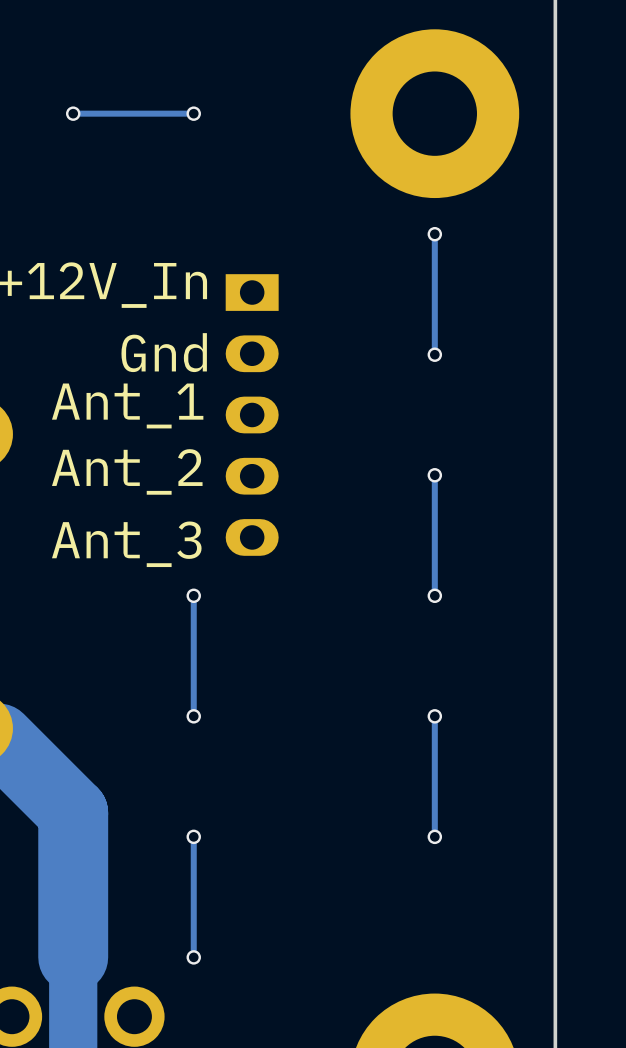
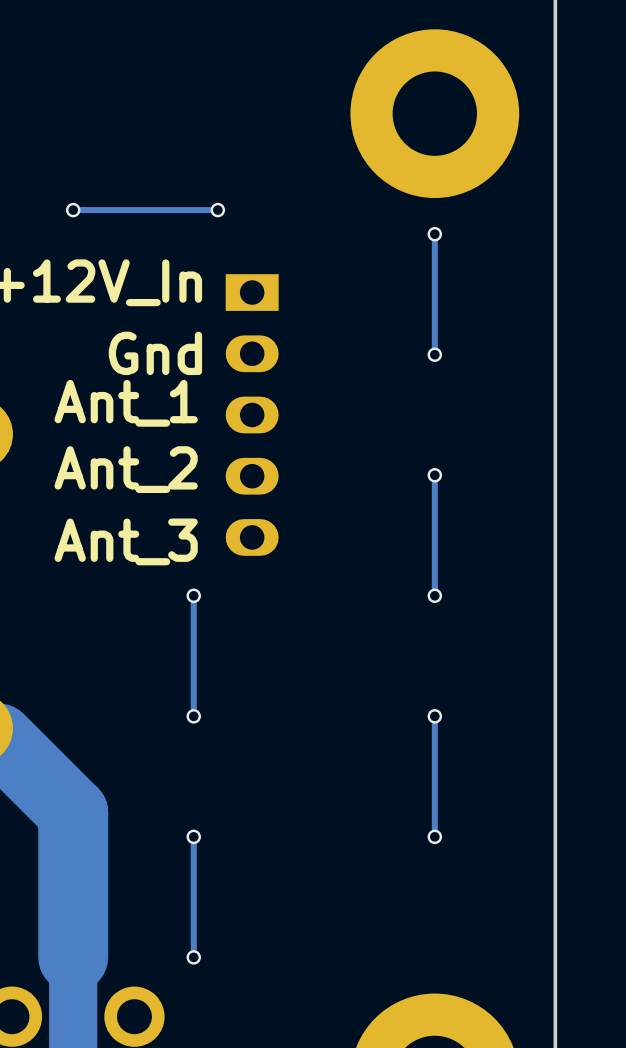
via: (73, 113) -> none
track: (193, 113) (73, 113) -> none
via: (193, 113) -> none
via: none -> (73, 210)
track: none -> (217, 210) (73, 210)
via: none -> (217, 210)

